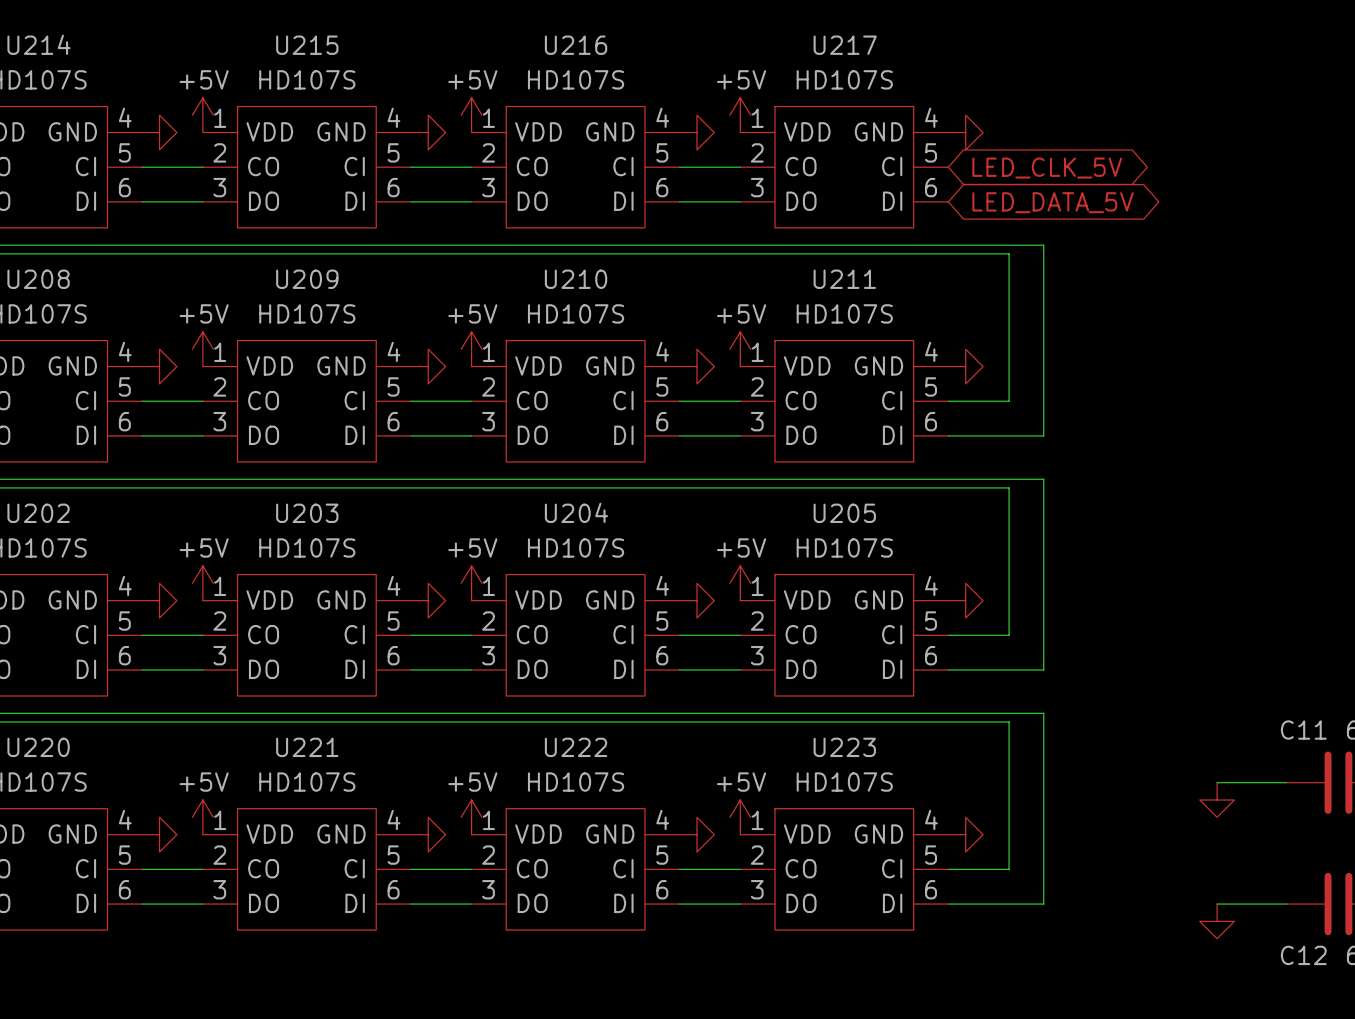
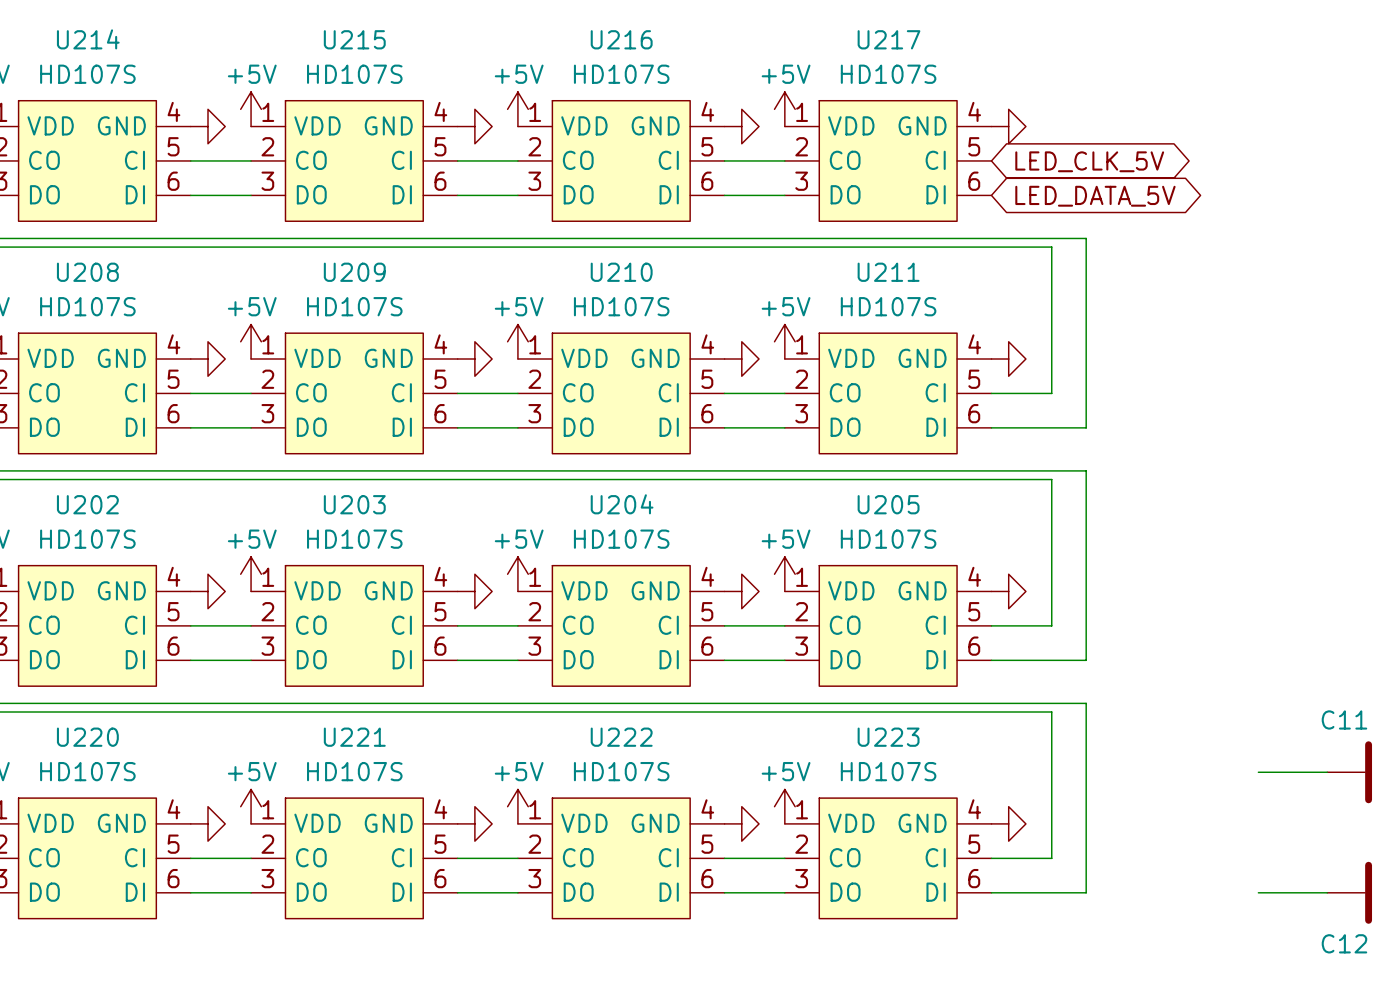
power symbol: (1217, 800) -> none
power symbol: (1217, 921) -> none

